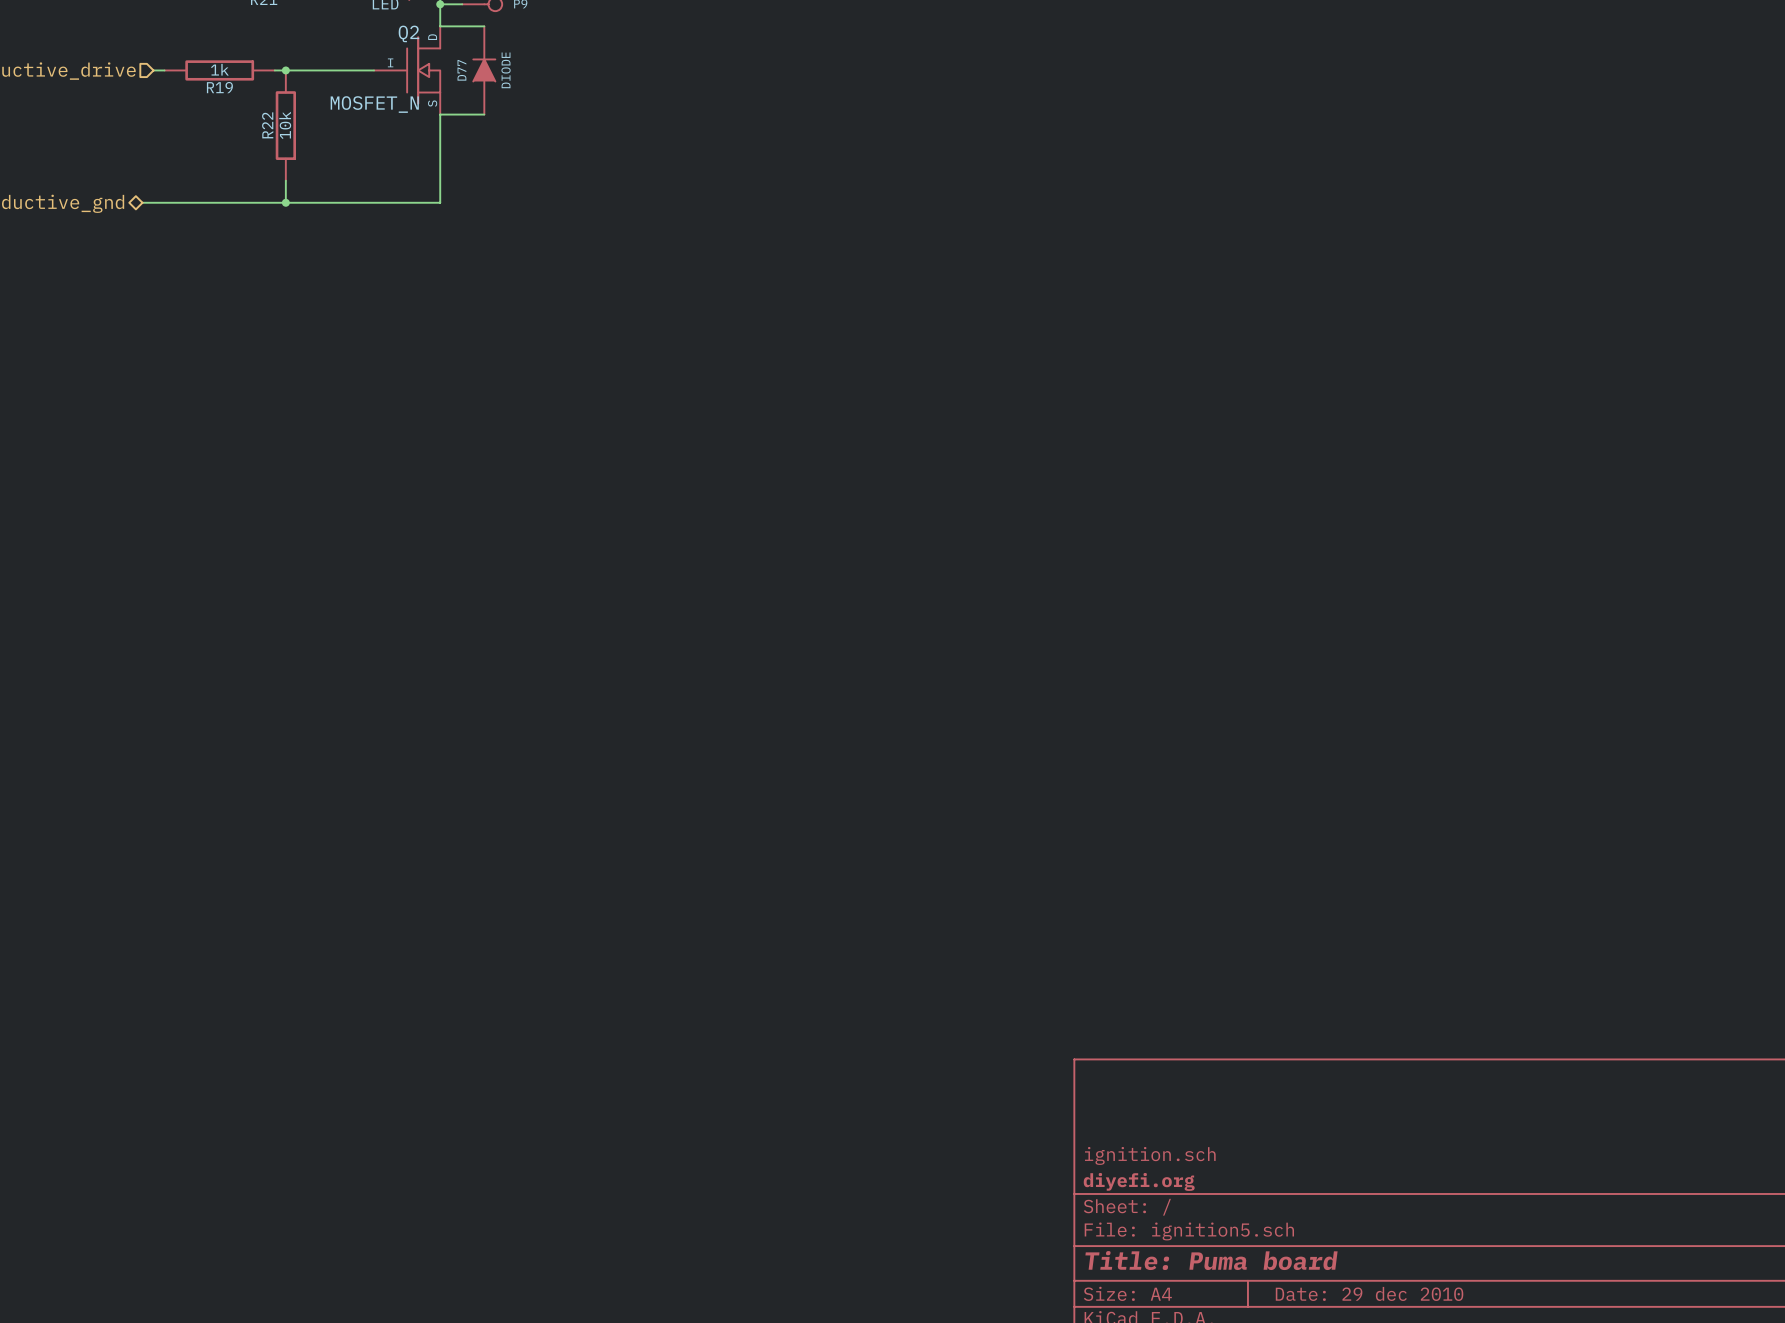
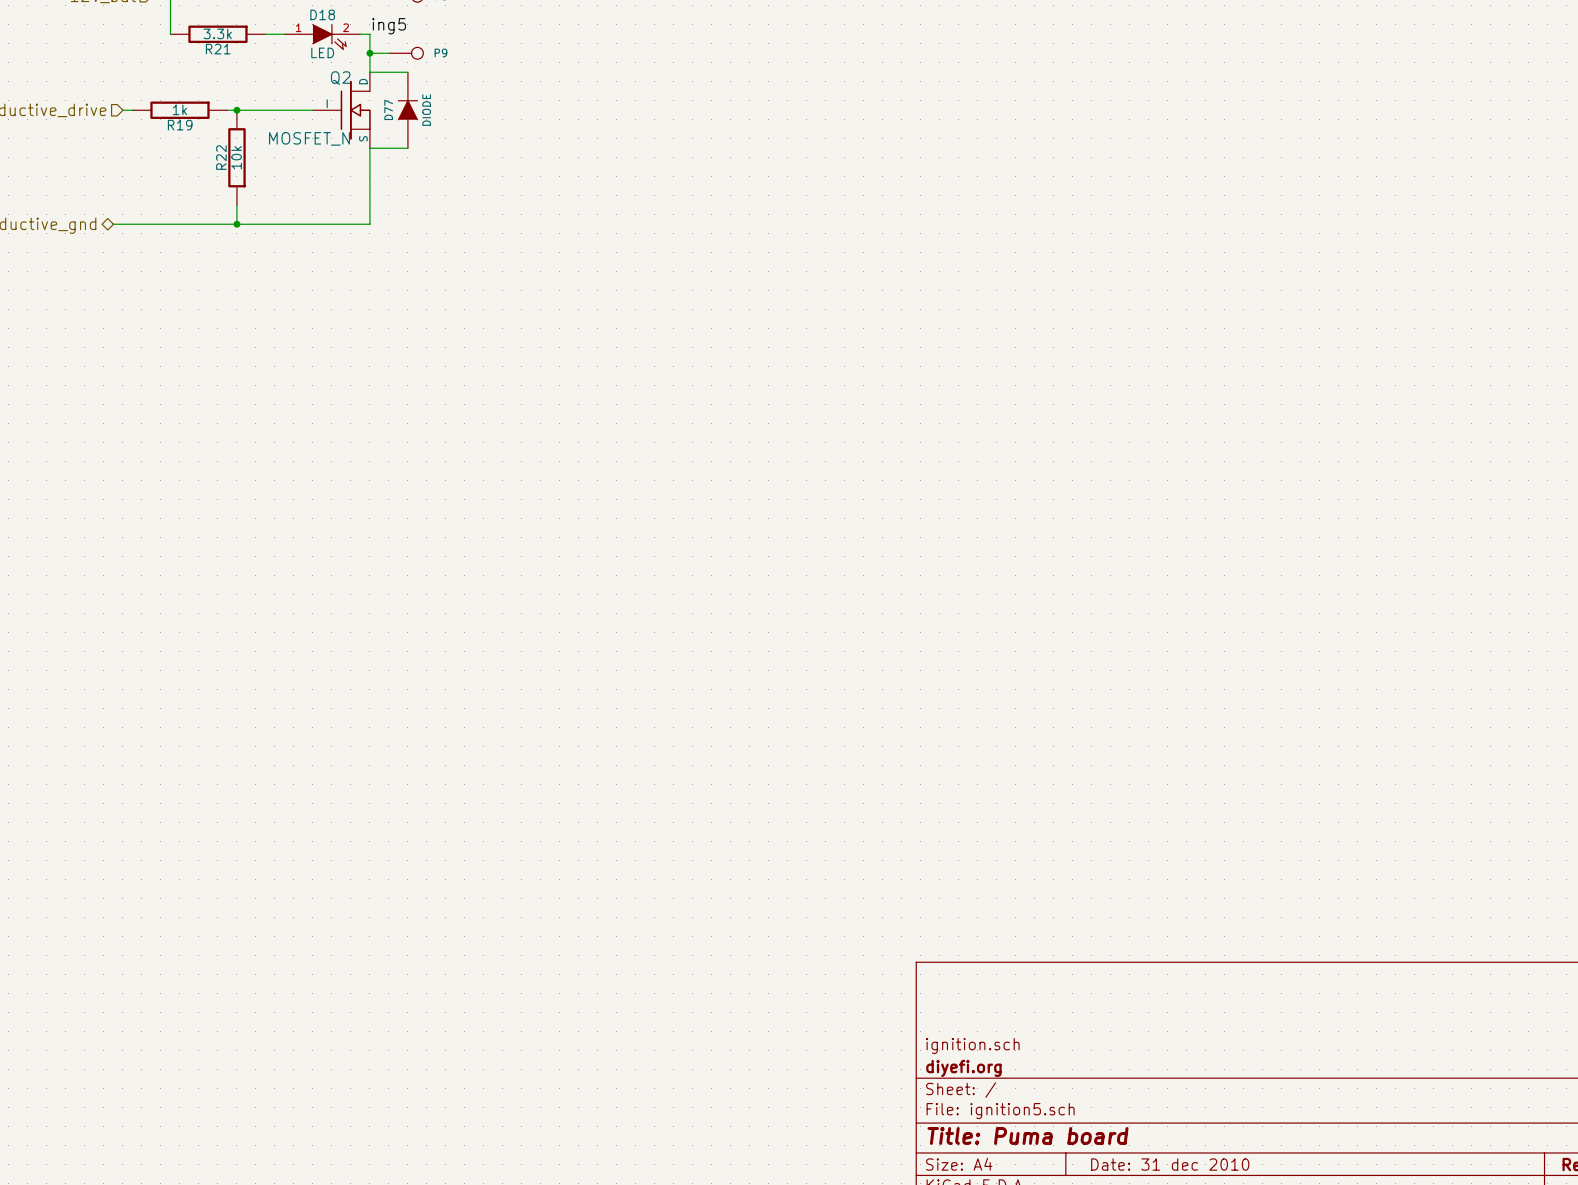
title block: Date: 29 dec 2010 (1369, 1293) -> Date: 31 dec 2010 (1170, 1164)

